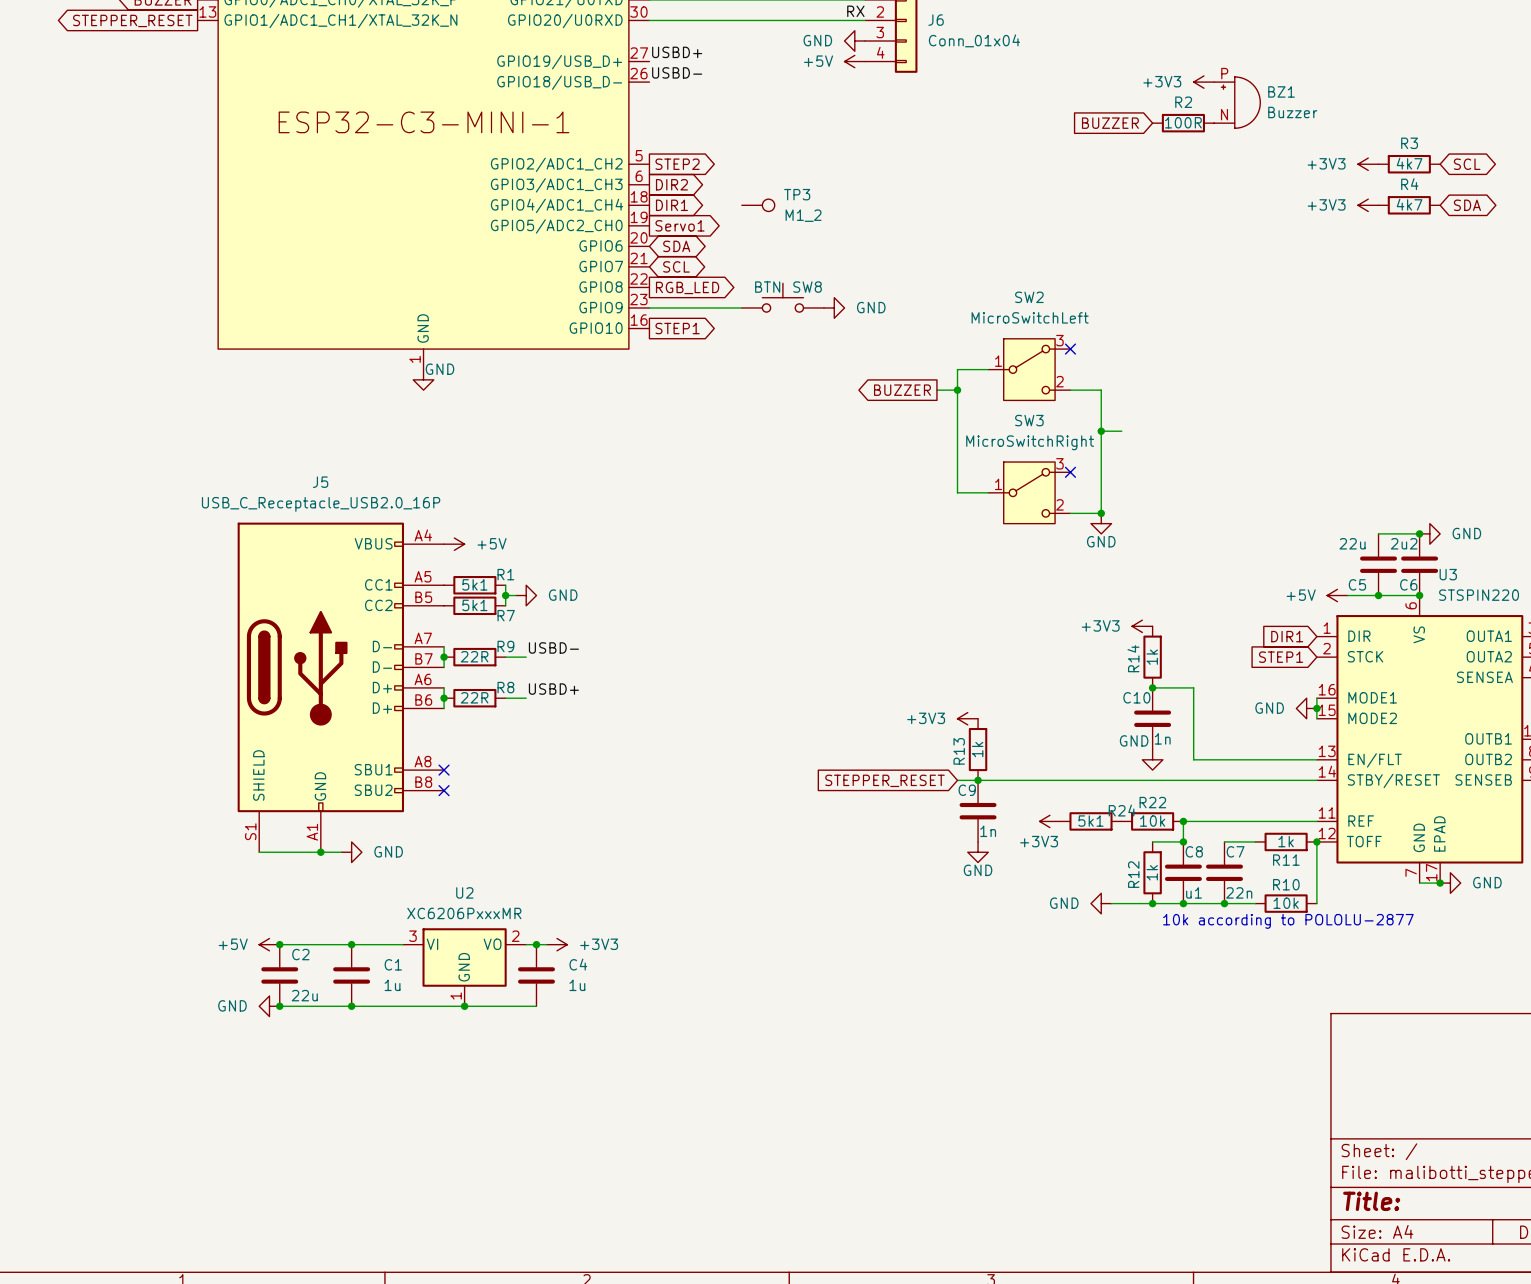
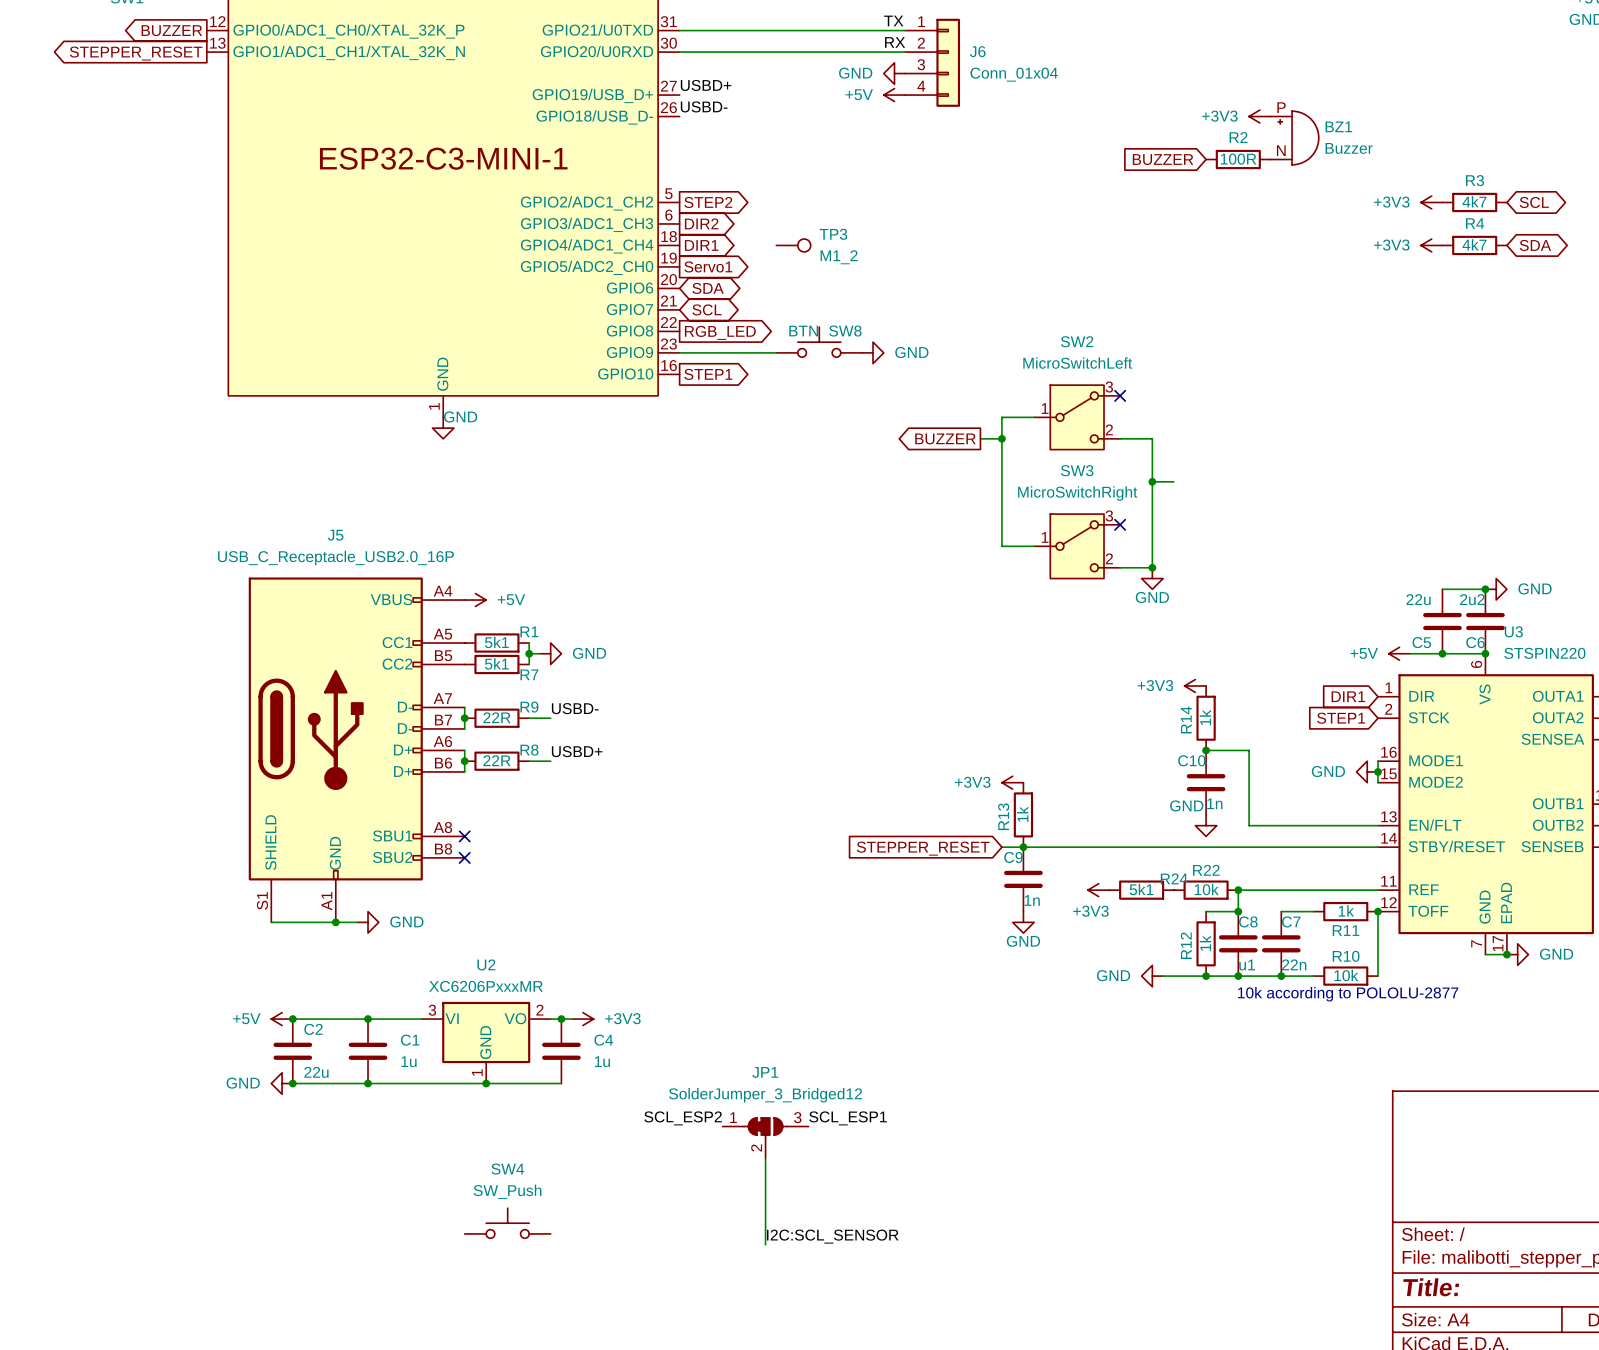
label: none -> SCL_ESP2 (683, 1118)
label: none -> SCL_ESP1 (848, 1118)
JP1: none -> SolderJumper_3_Bridged12 (765, 1138)
wire: none -> (765, 1158) (765, 1244)
SW4: none -> SW_Push (507, 1223)
label: none -> I2C:SCL_SENSOR (832, 1236)

